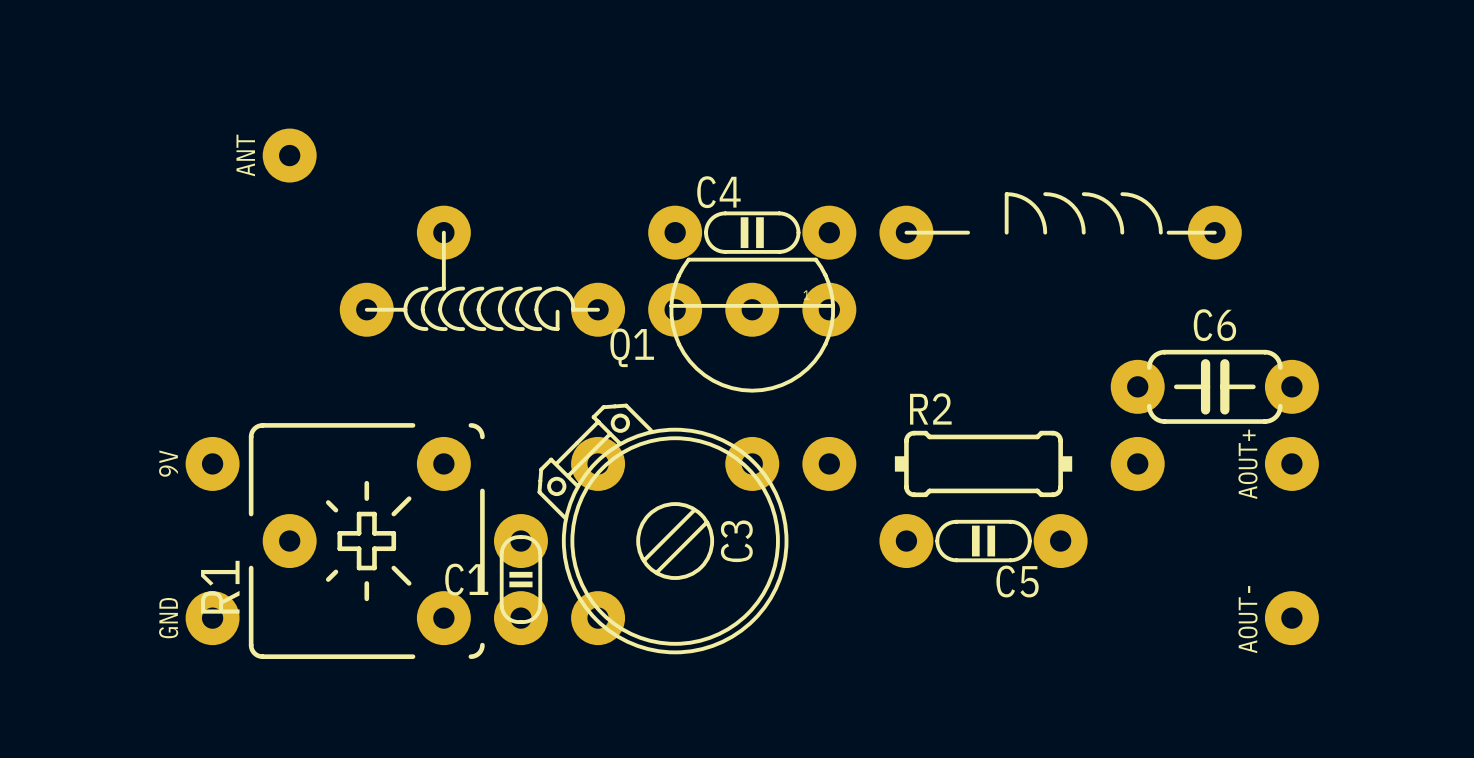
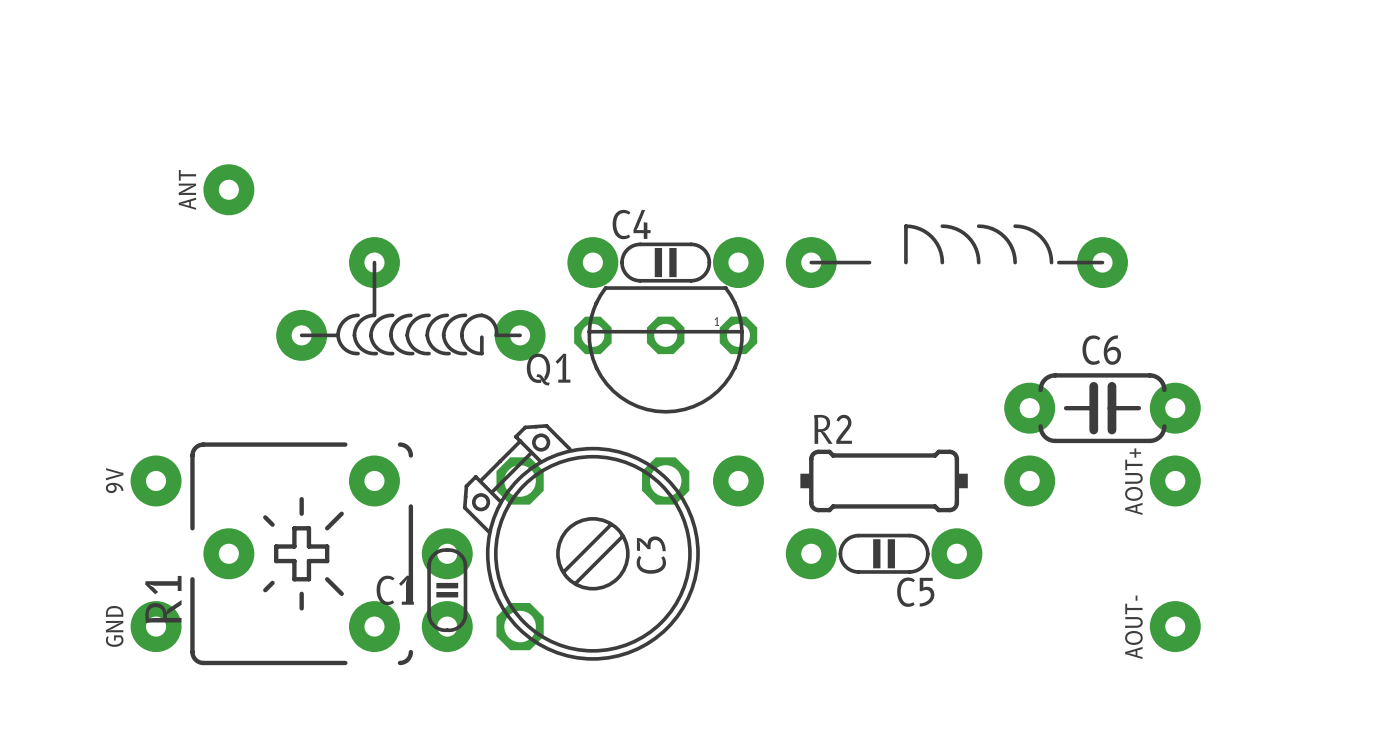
Q1 footprint: [648, 257, 857, 393] -> [574, 286, 758, 414]
C3 footprint: [537, 403, 789, 655] -> [462, 424, 700, 661]

